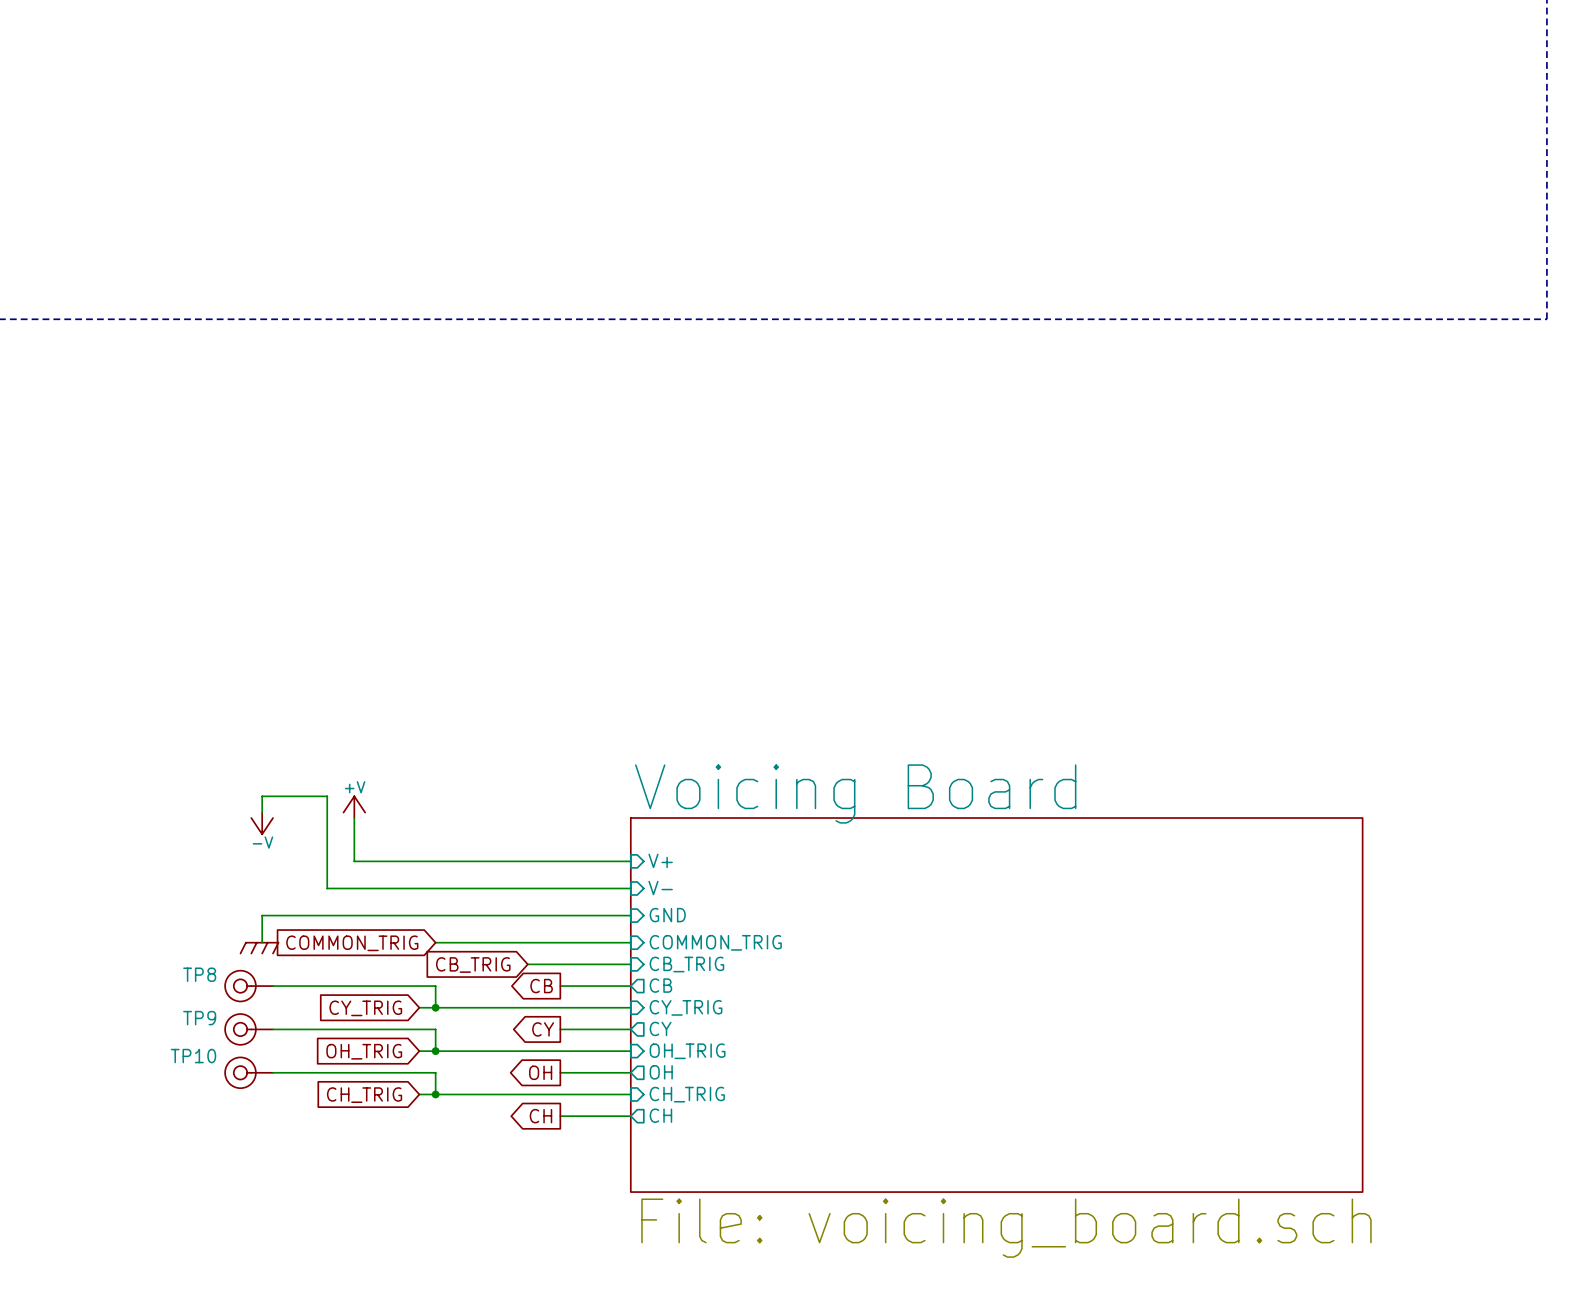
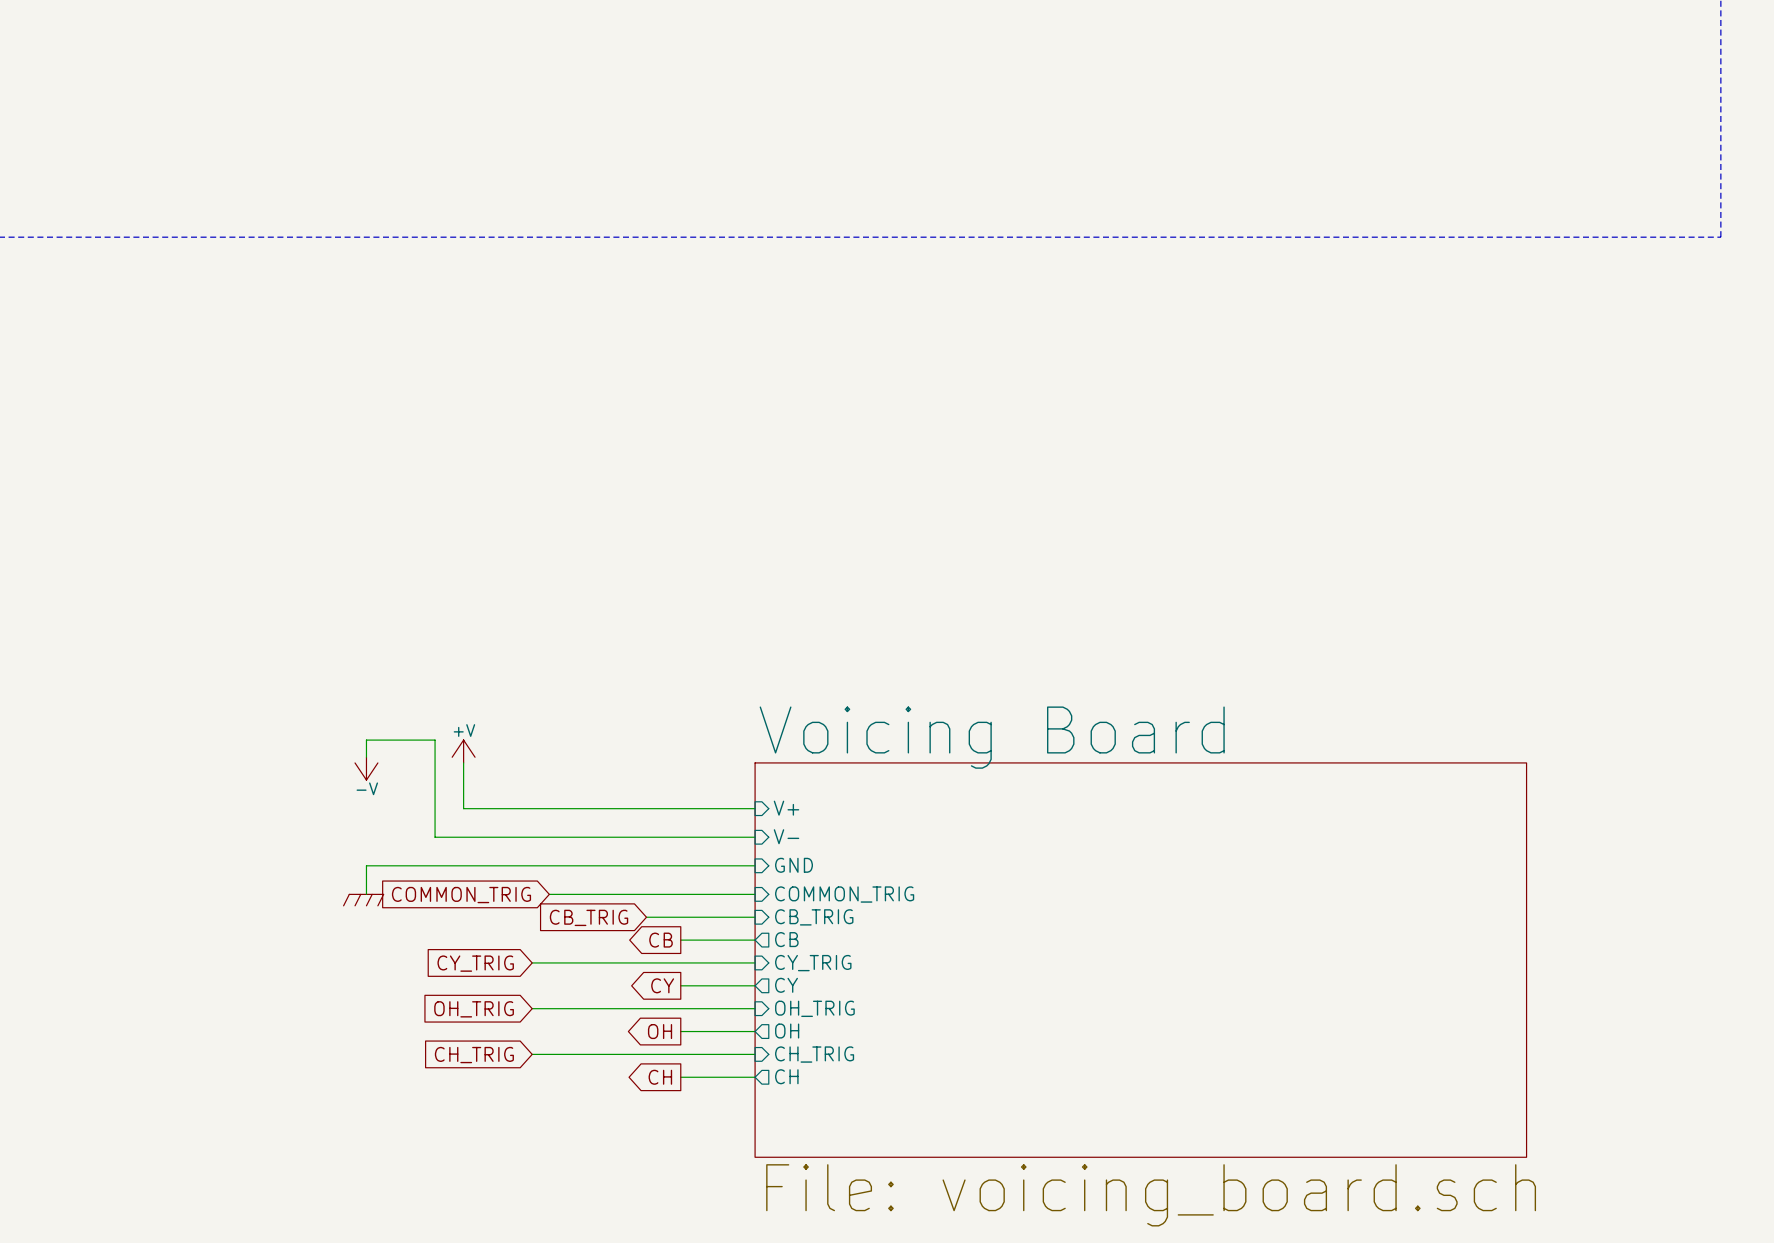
TP8: (249, 986) -> none
wire: (273, 986) (435, 986) (435, 1007) -> none
junction: (435, 1007) -> none
TP9: (249, 1029) -> none
wire: (273, 1029) (435, 1029) (435, 1051) -> none
junction: (435, 1051) -> none
TP10: (249, 1072) -> none
wire: (273, 1072) (435, 1072) (435, 1094) -> none
junction: (435, 1094) -> none

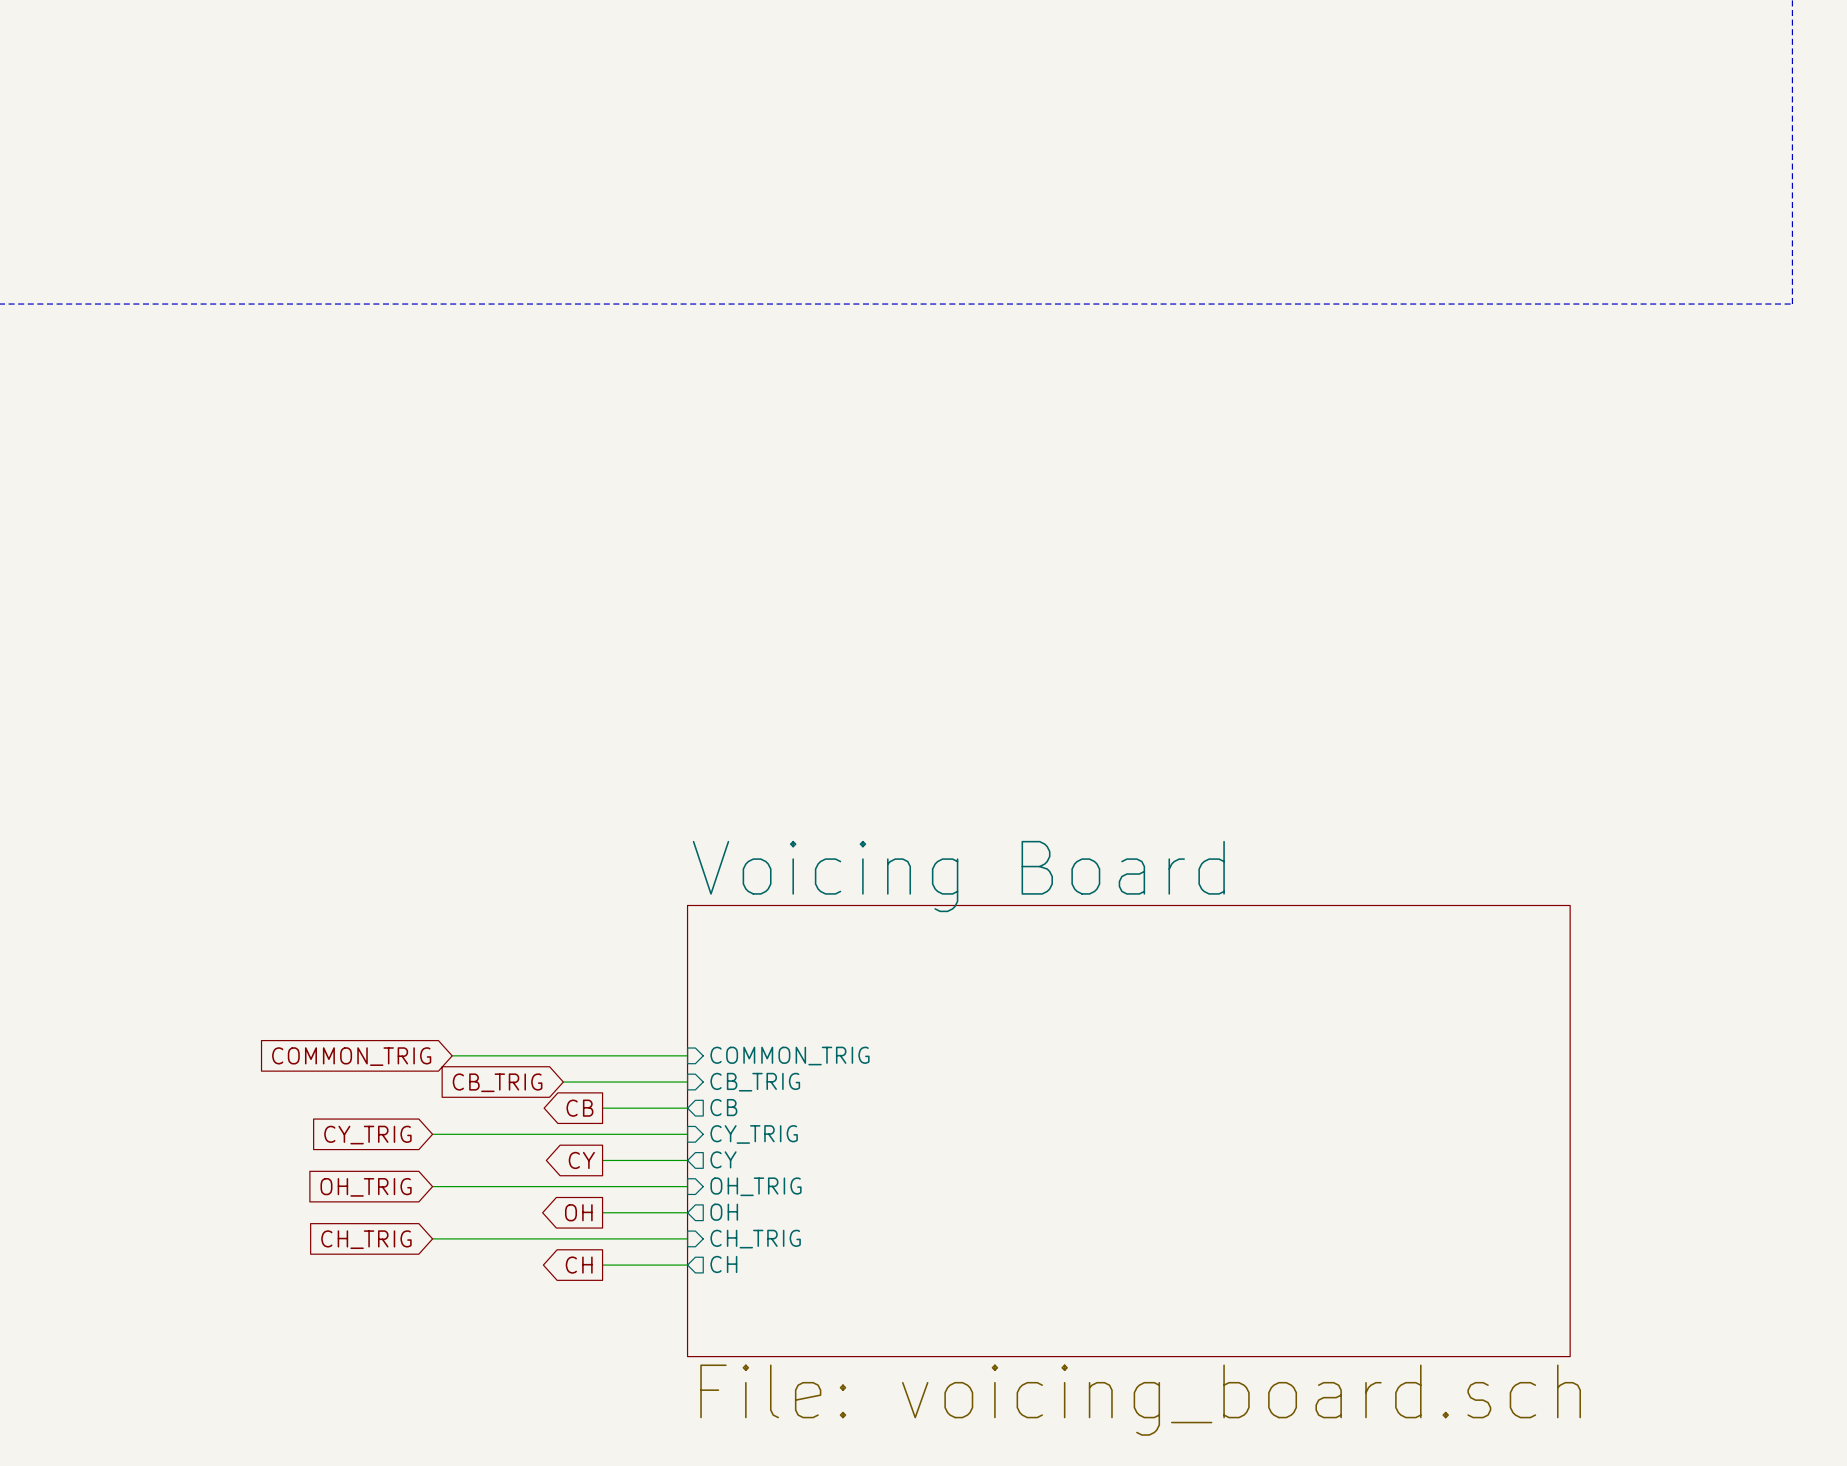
power symbol: +V (463, 751) -> none
wire: (366, 757) (366, 740) (435, 740) (435, 837) (755, 837) -> none
wire: (463, 762) (463, 808) (755, 808) -> none
power symbol: -V (366, 768) -> none
sheet pin: V+ (786, 808) -> none
sheet pin: V- (786, 836) -> none
wire: (755, 865) (366, 865) (366, 894) -> none
sheet pin: GND (794, 865) -> none
power symbol: (363, 900) -> none

